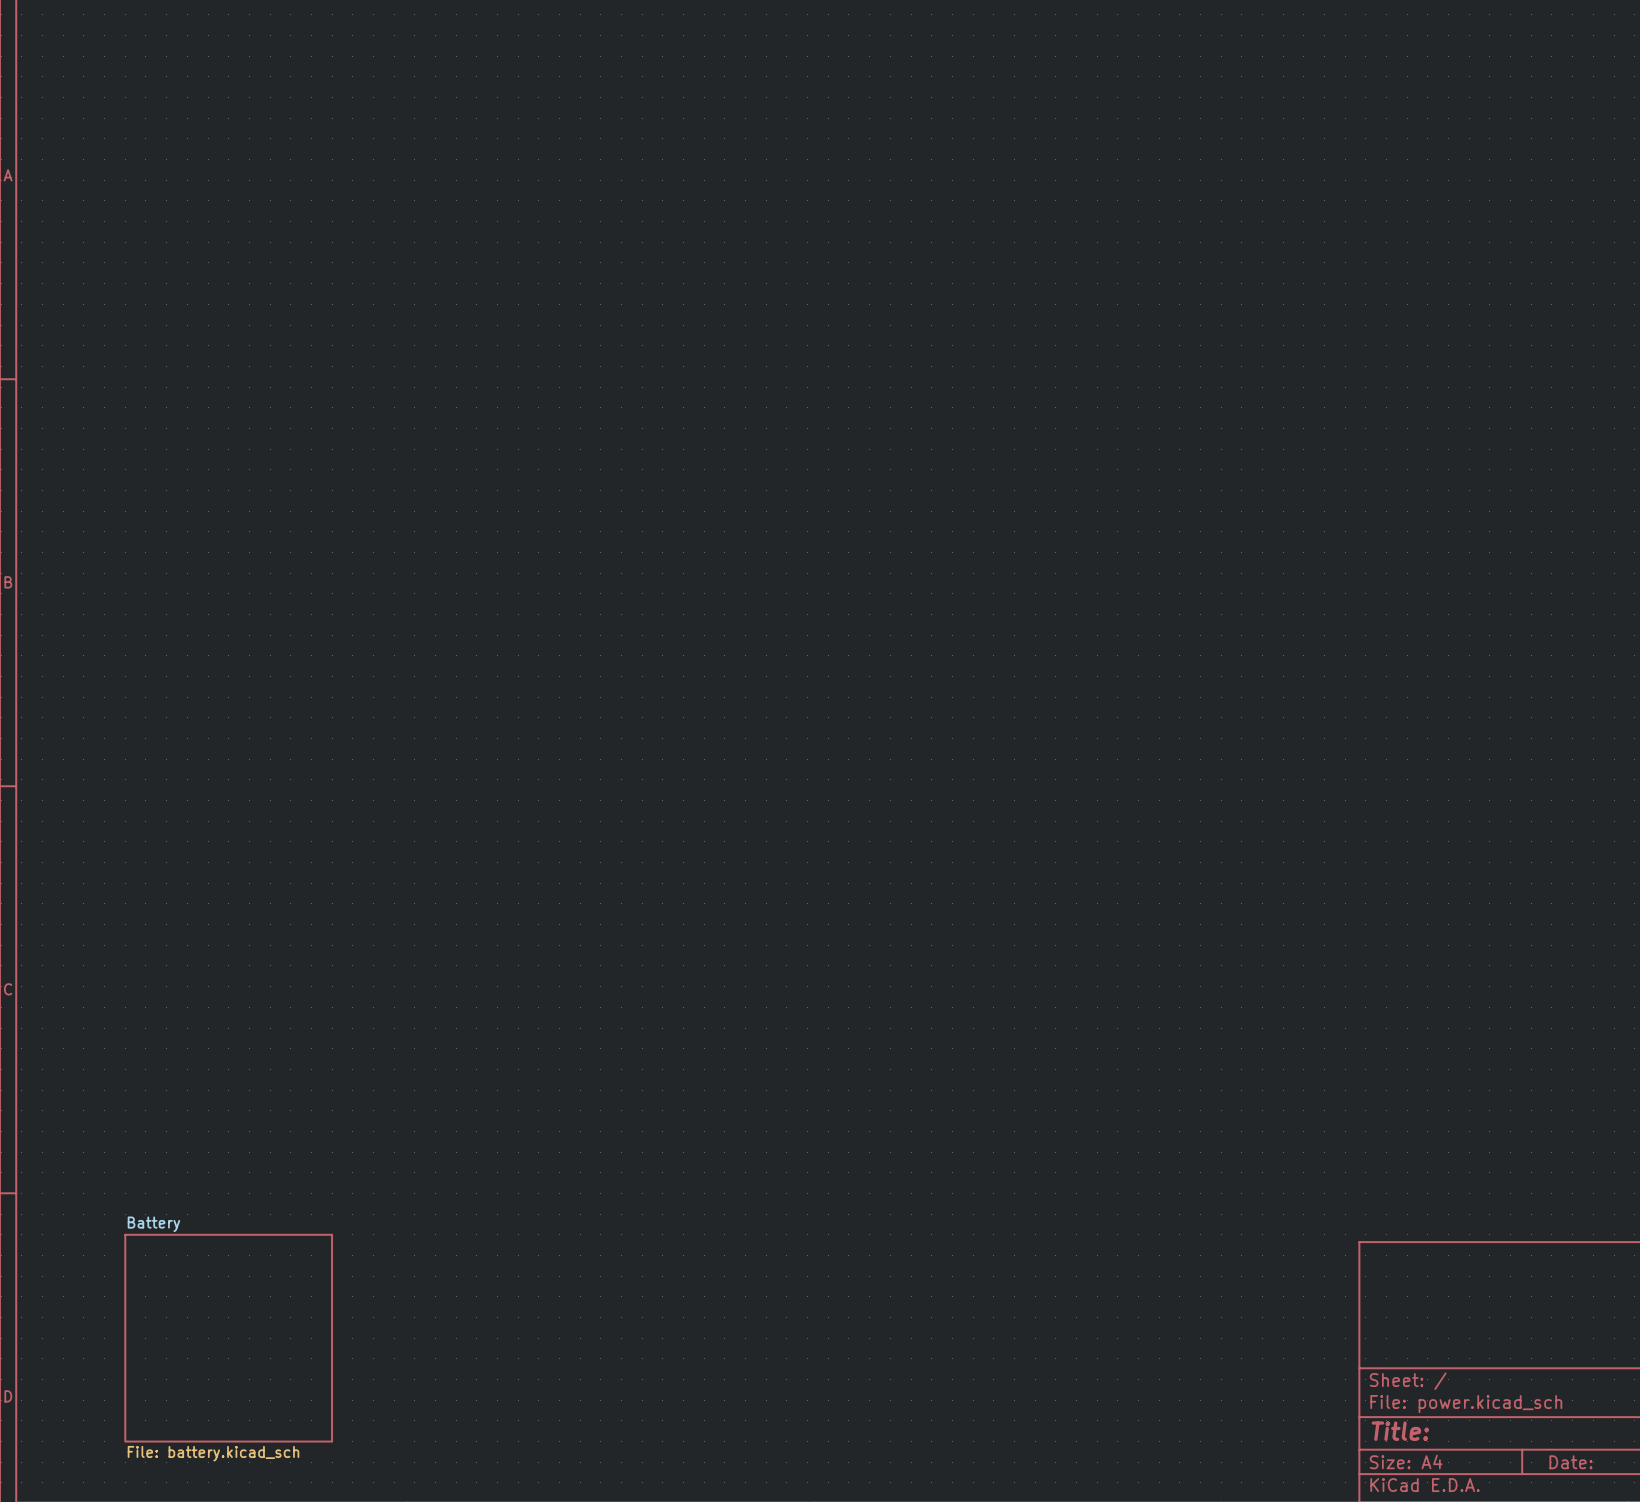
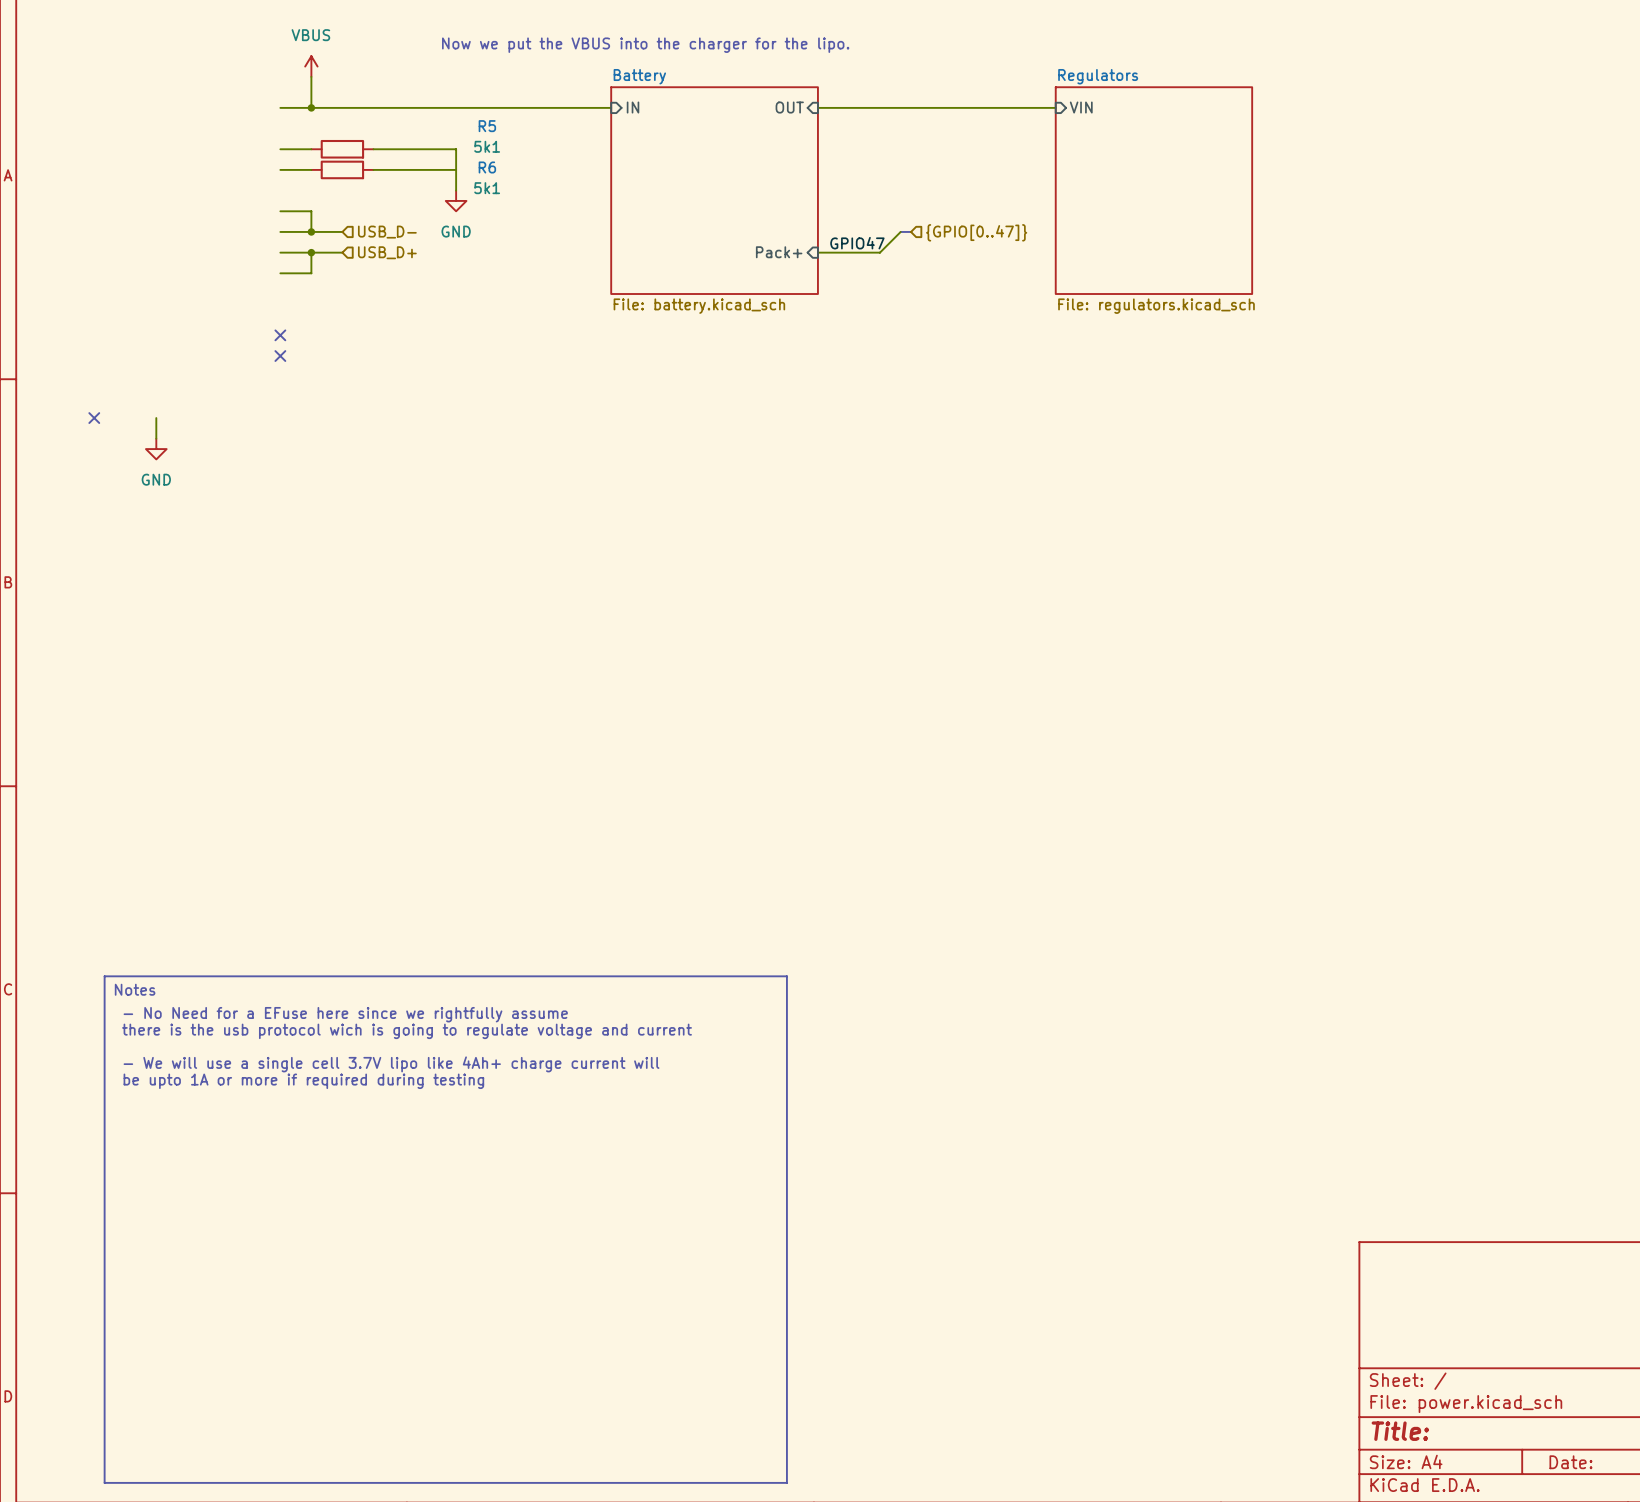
text: none -> Now we put the VBUS into the charger for the lipo. (645, 45)
power symbol: none -> VBUS (311, 66)
wire: none -> (311, 76) (311, 107)
wire: none -> (280, 107) (611, 107)
junction: none -> (311, 107)
sheet pin: none -> IN (633, 107)
sheet pin: none -> OUT (789, 107)
wire: none -> (817, 107) (1055, 107)
sheet pin: none -> VIN (1081, 107)
wire: none -> (280, 149) (311, 149)
R5: none -> 5k1 (342, 149)
wire: none -> (373, 149) (456, 149) (456, 190)
wire: none -> (280, 169) (311, 169)
R6: none -> 5k1 (342, 169)
wire: none -> (373, 169) (456, 169)
sheet Battery: none -> File: battery.kicad_sch (714, 190)
sheet Regulators: none -> File: regulators.kicad_sch (1153, 190)
power symbol: none -> GND (456, 200)
wire: none -> (280, 211) (311, 211) (311, 231)
wire: none -> (280, 231) (342, 231)
junction: none -> (311, 231)
wire: none -> (900, 231) (879, 252) (817, 252)
bus: none -> (900, 231) (911, 231)
hierarchical label: none -> USB_D- (387, 232)
hierarchical label: none -> {GPIO[0..47]} (976, 232)
label: none -> GPIO47 (857, 243)
wire: none -> (280, 252) (342, 252)
wire: none -> (311, 252) (311, 273) (280, 273)
junction: none -> (311, 252)
hierarchical label: none -> USB_D+ (387, 252)
sheet pin: none -> Pack+ (779, 252)
no-connect mark: none -> (280, 335)
no-connect mark: none -> (280, 356)
no-connect mark: none -> (94, 418)
wire: none -> (156, 418) (156, 438)
power symbol: none -> GND (156, 449)
line: none -> (104, 976) (786, 976) (786, 1482) (104, 1482) (104, 976)
text: none -> Notes (135, 989)
text: none -> - No Need for a EFuse here since we rightfully assume (345, 1014)
text: none -> there is the usb protocol wich is going to regulate voltage and current (407, 1031)
text: none -> - We will use a single cell 3.7V lipo like 4Ah+ charge current will (391, 1064)
text: none -> be upto 1A or more if required during testing (303, 1081)
sheet Battery: File: battery.kicad_sch (228, 1338) -> none

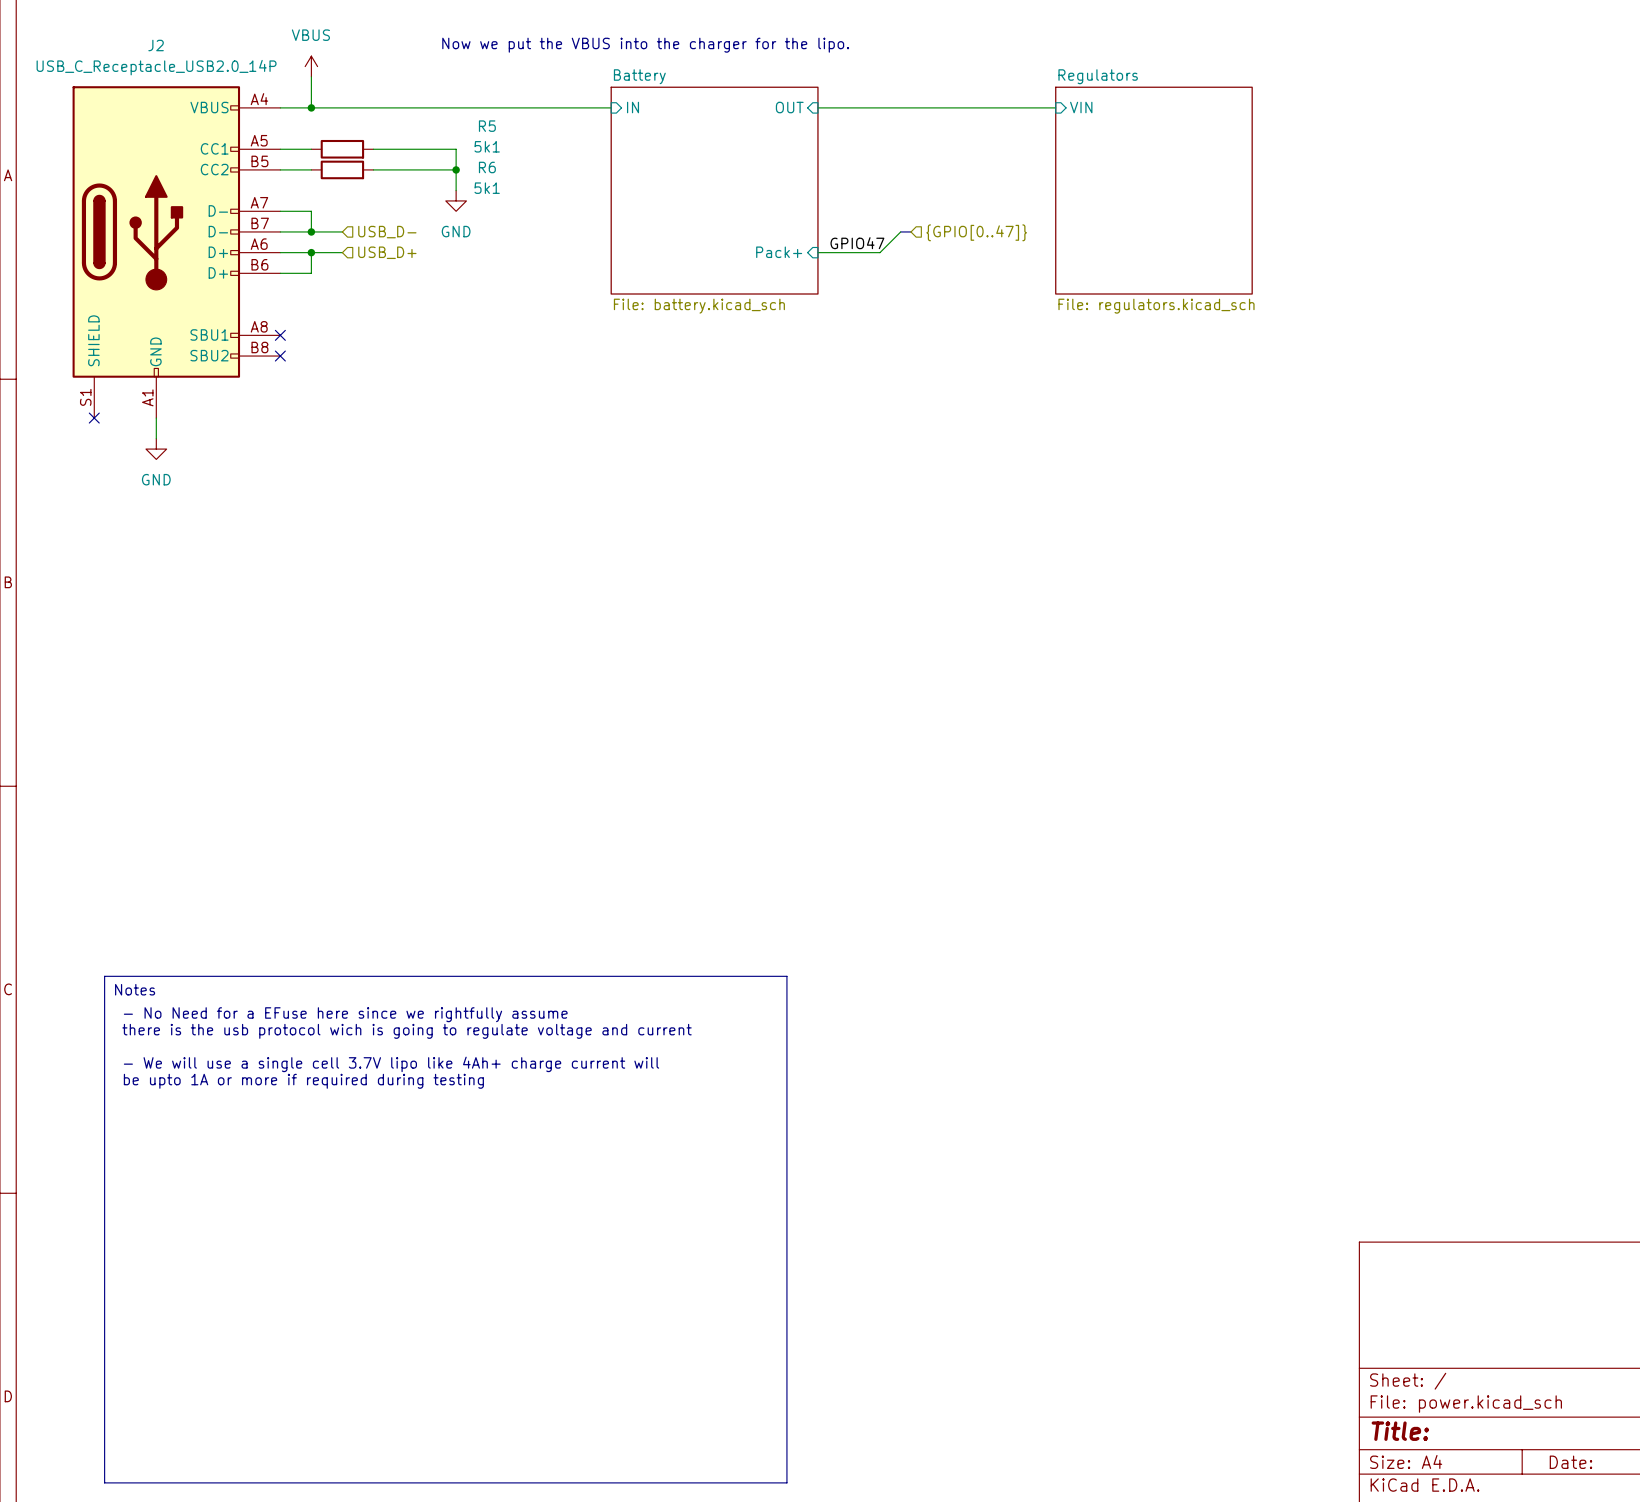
junction: none -> (456, 169)
J2: none -> USB_C_Receptacle_USB2.0_14P (176, 252)

